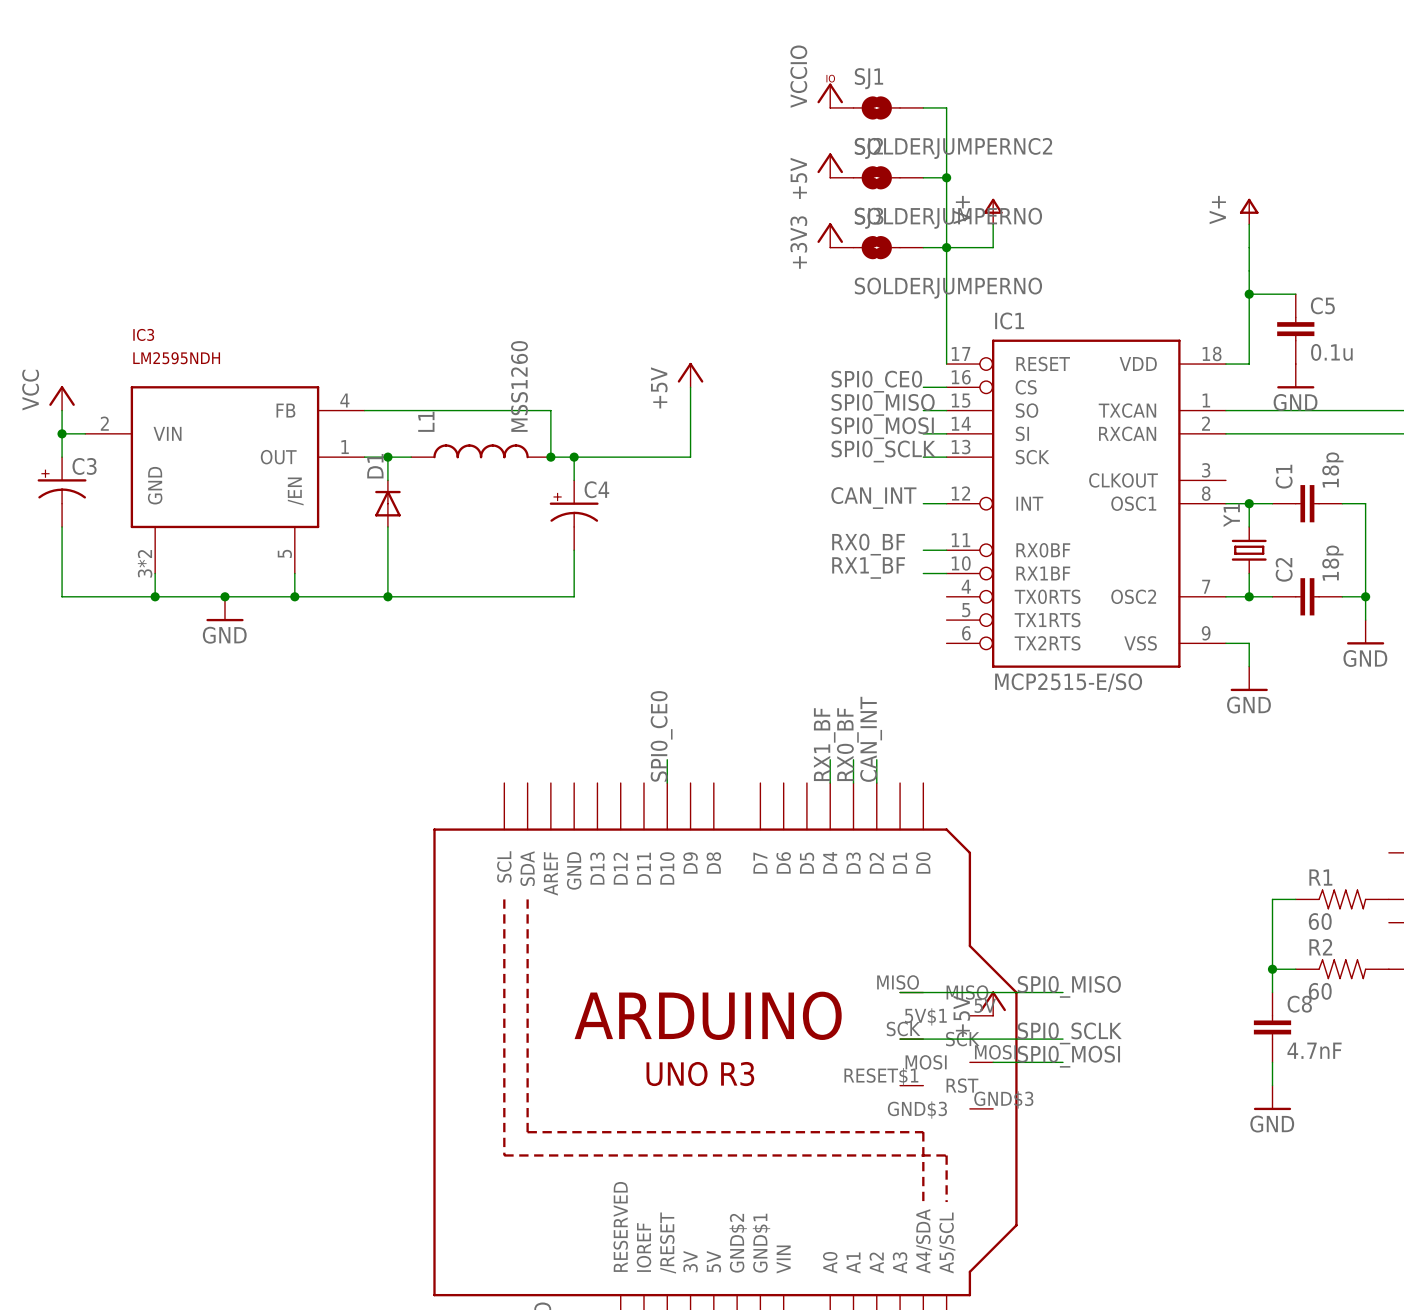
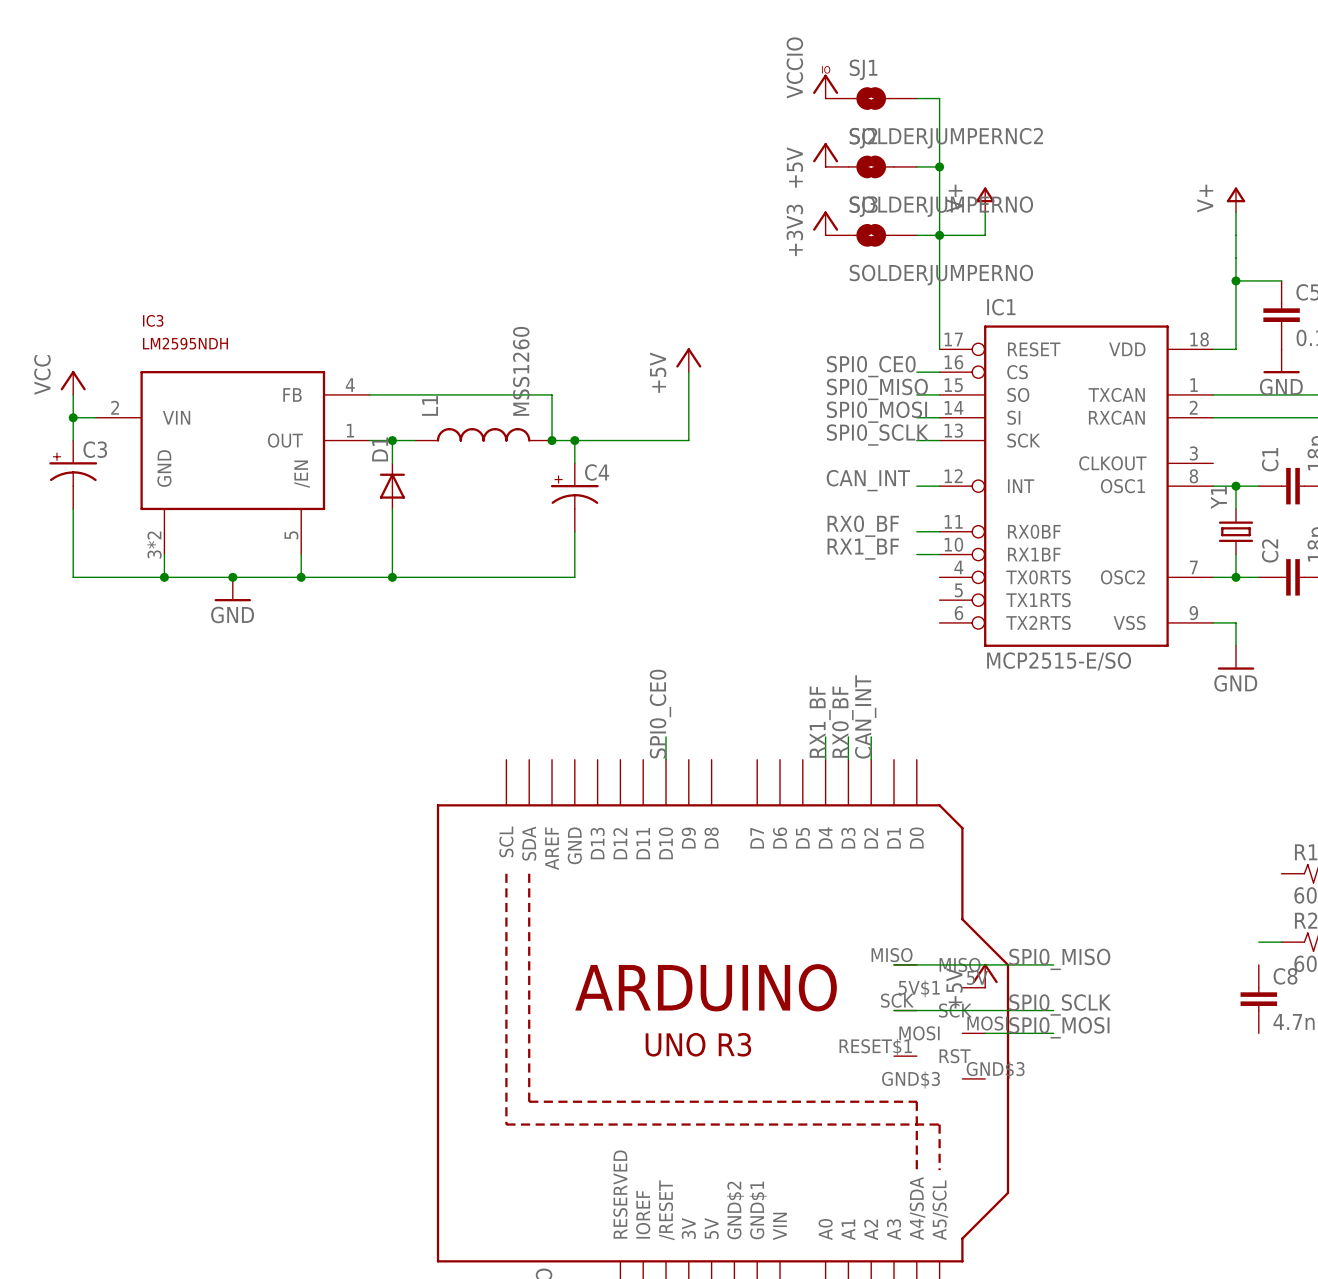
wire: (1295, 899) (1272, 899) (1272, 992) -> none
junction: (1272, 969) -> none
wire: (1272, 1062) (1272, 1085) -> none
power symbol: GND (1272, 1097) -> none

